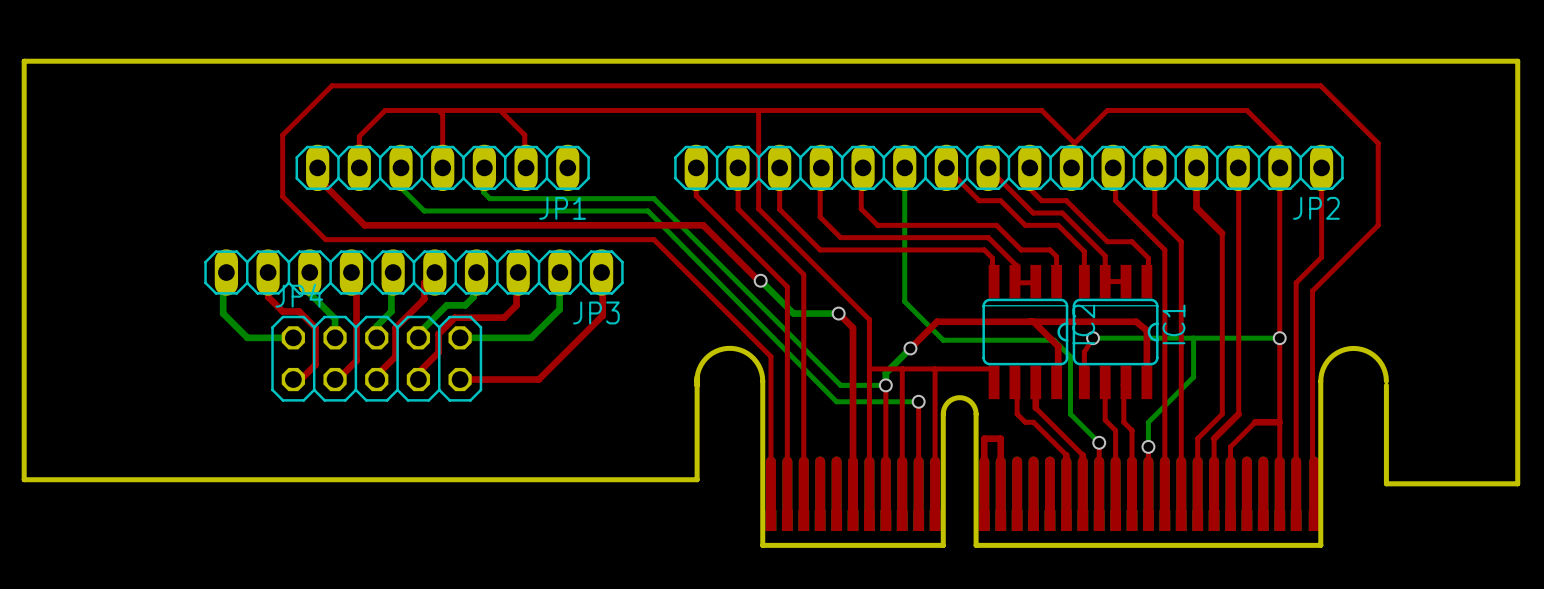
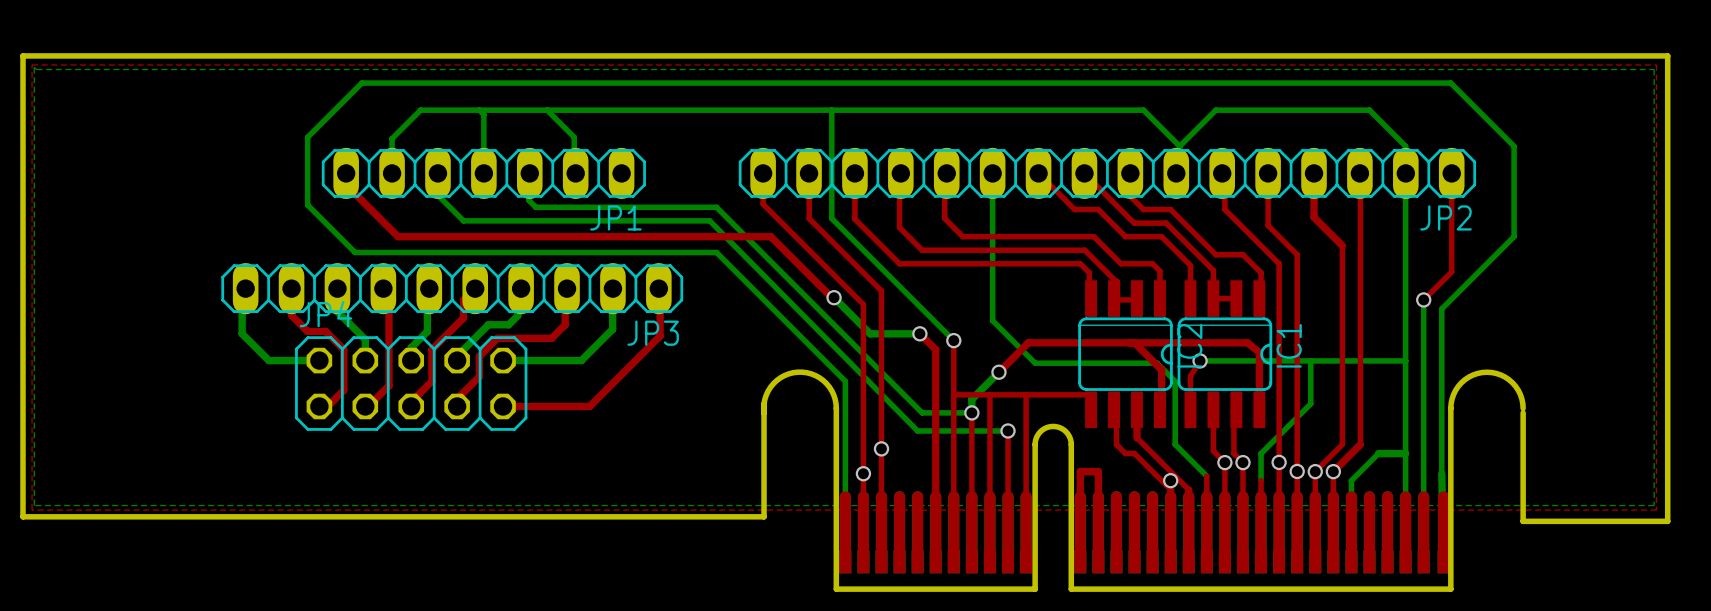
top zone outline: none -> (32, 64) (1656, 64) (1656, 510) (32, 510) (32, 64)
bottom zone outline: none -> (34, 67) (34, 505) (1654, 505) (1654, 69) (36, 69) (34, 67)
top track: (438, 110) (442, 114) (442, 167) -> none
bottom track: none -> (479, 110) (483, 114) (483, 173)
top track: (500, 110) (524, 135) (526, 167) -> none
bottom track: none -> (547, 110) (574, 137) (574, 162)
top track: (758, 110) (758, 208) (869, 319) -> none
bottom track: none -> (831, 110) (831, 218) (953, 340)
top track: (1074, 143) (1041, 110) (385, 110) (359, 136) (359, 167) -> none
top track: (1074, 143) (1107, 110) (1246, 110) (1279, 143) (1279, 167) -> none
bottom track: none -> (1179, 146) (1143, 110) (420, 110) (392, 138) (392, 173)
bottom track: none -> (1179, 146) (1215, 110) (1369, 110) (1405, 146) (1405, 173)
top track: (1279, 168) (1279, 520) -> none
bottom track: none -> (1405, 173) (1405, 561)
top track: (1296, 282) (1296, 520) -> none
bottom track: none -> (1423, 299) (1423, 561)
via: none -> (953, 340)
via position: (1279, 338) -> (1423, 299)
via: none -> (881, 448)
top track: (1279, 422) (1255, 422) (1230, 446) (1230, 520) -> none
bottom track: none -> (1405, 453) (1378, 453) (1351, 480) (1351, 561)
via: none -> (1224, 462)
via: none -> (1242, 462)
via: none -> (1279, 462)
via: none -> (1297, 471)
via: none -> (1315, 471)
via: none -> (1333, 471)
via: none -> (863, 473)
via: (1099, 442) -> none
via: none -> (1170, 480)
via: (1148, 446) -> none
top track: (1314, 520) (1312, 520) (1312, 290) (1378, 225) (1378, 143) (1320, 85) (331, 85) (282, 135) (282, 196) (325, 239) (654, 239) (770, 356) (770, 520) -> none
bottom track: none -> (1443, 561) (1441, 308) (1514, 236) (1514, 146) (1450, 83) (361, 83) (307, 137) (307, 205) (355, 252) (716, 252) (845, 381) (845, 562)

